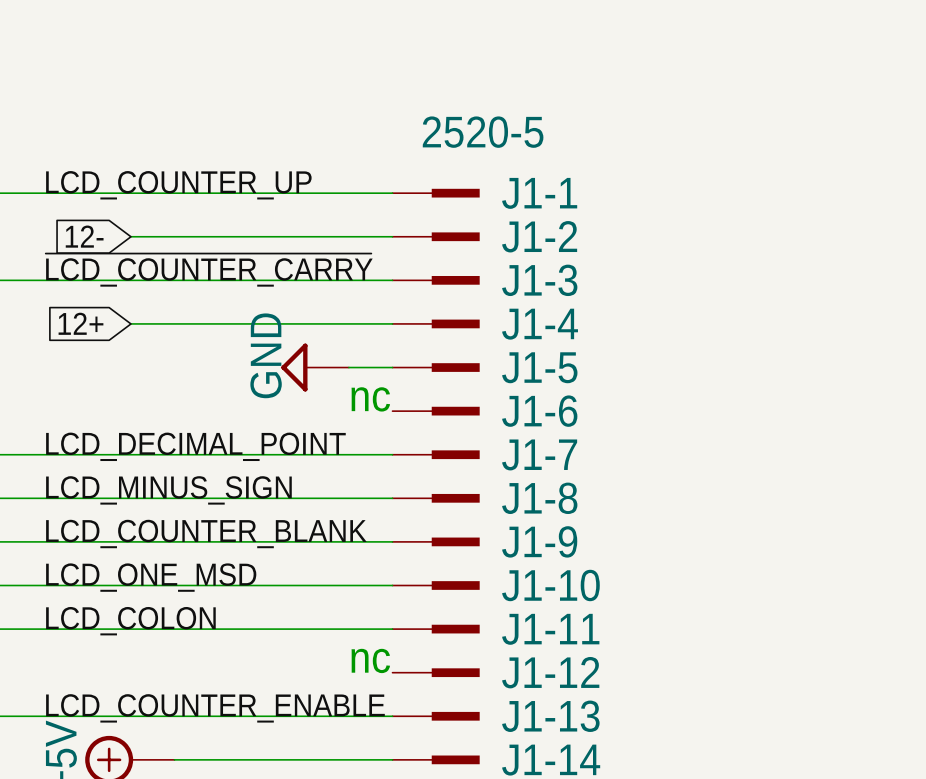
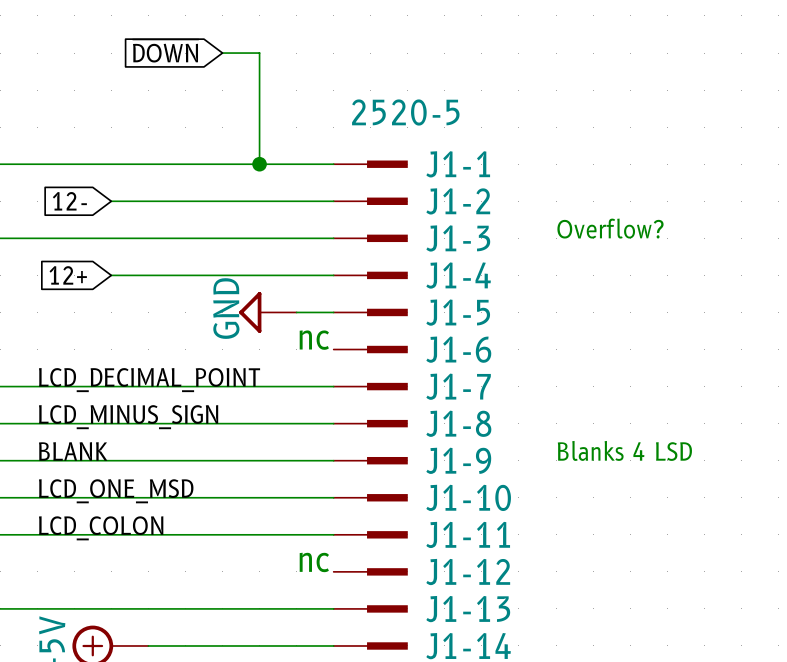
global label: none -> ~{DOWN} (165, 51)
wire: none -> (222, 53) (259, 53) (259, 164)
label: LCD_COUNTER_UP (178, 185) -> none
junction: none -> (259, 164)
text: none -> Overflow? (610, 228)
label: ~{LCD_COUNTER_CARRY} (209, 270) -> none
text: none -> Blanks 4 LSD (624, 450)
label: LCD_COUNTER_BLANK (206, 533) -> BLANK (73, 451)
label: LCD_COUNTER_ENABLE (215, 708) -> none

